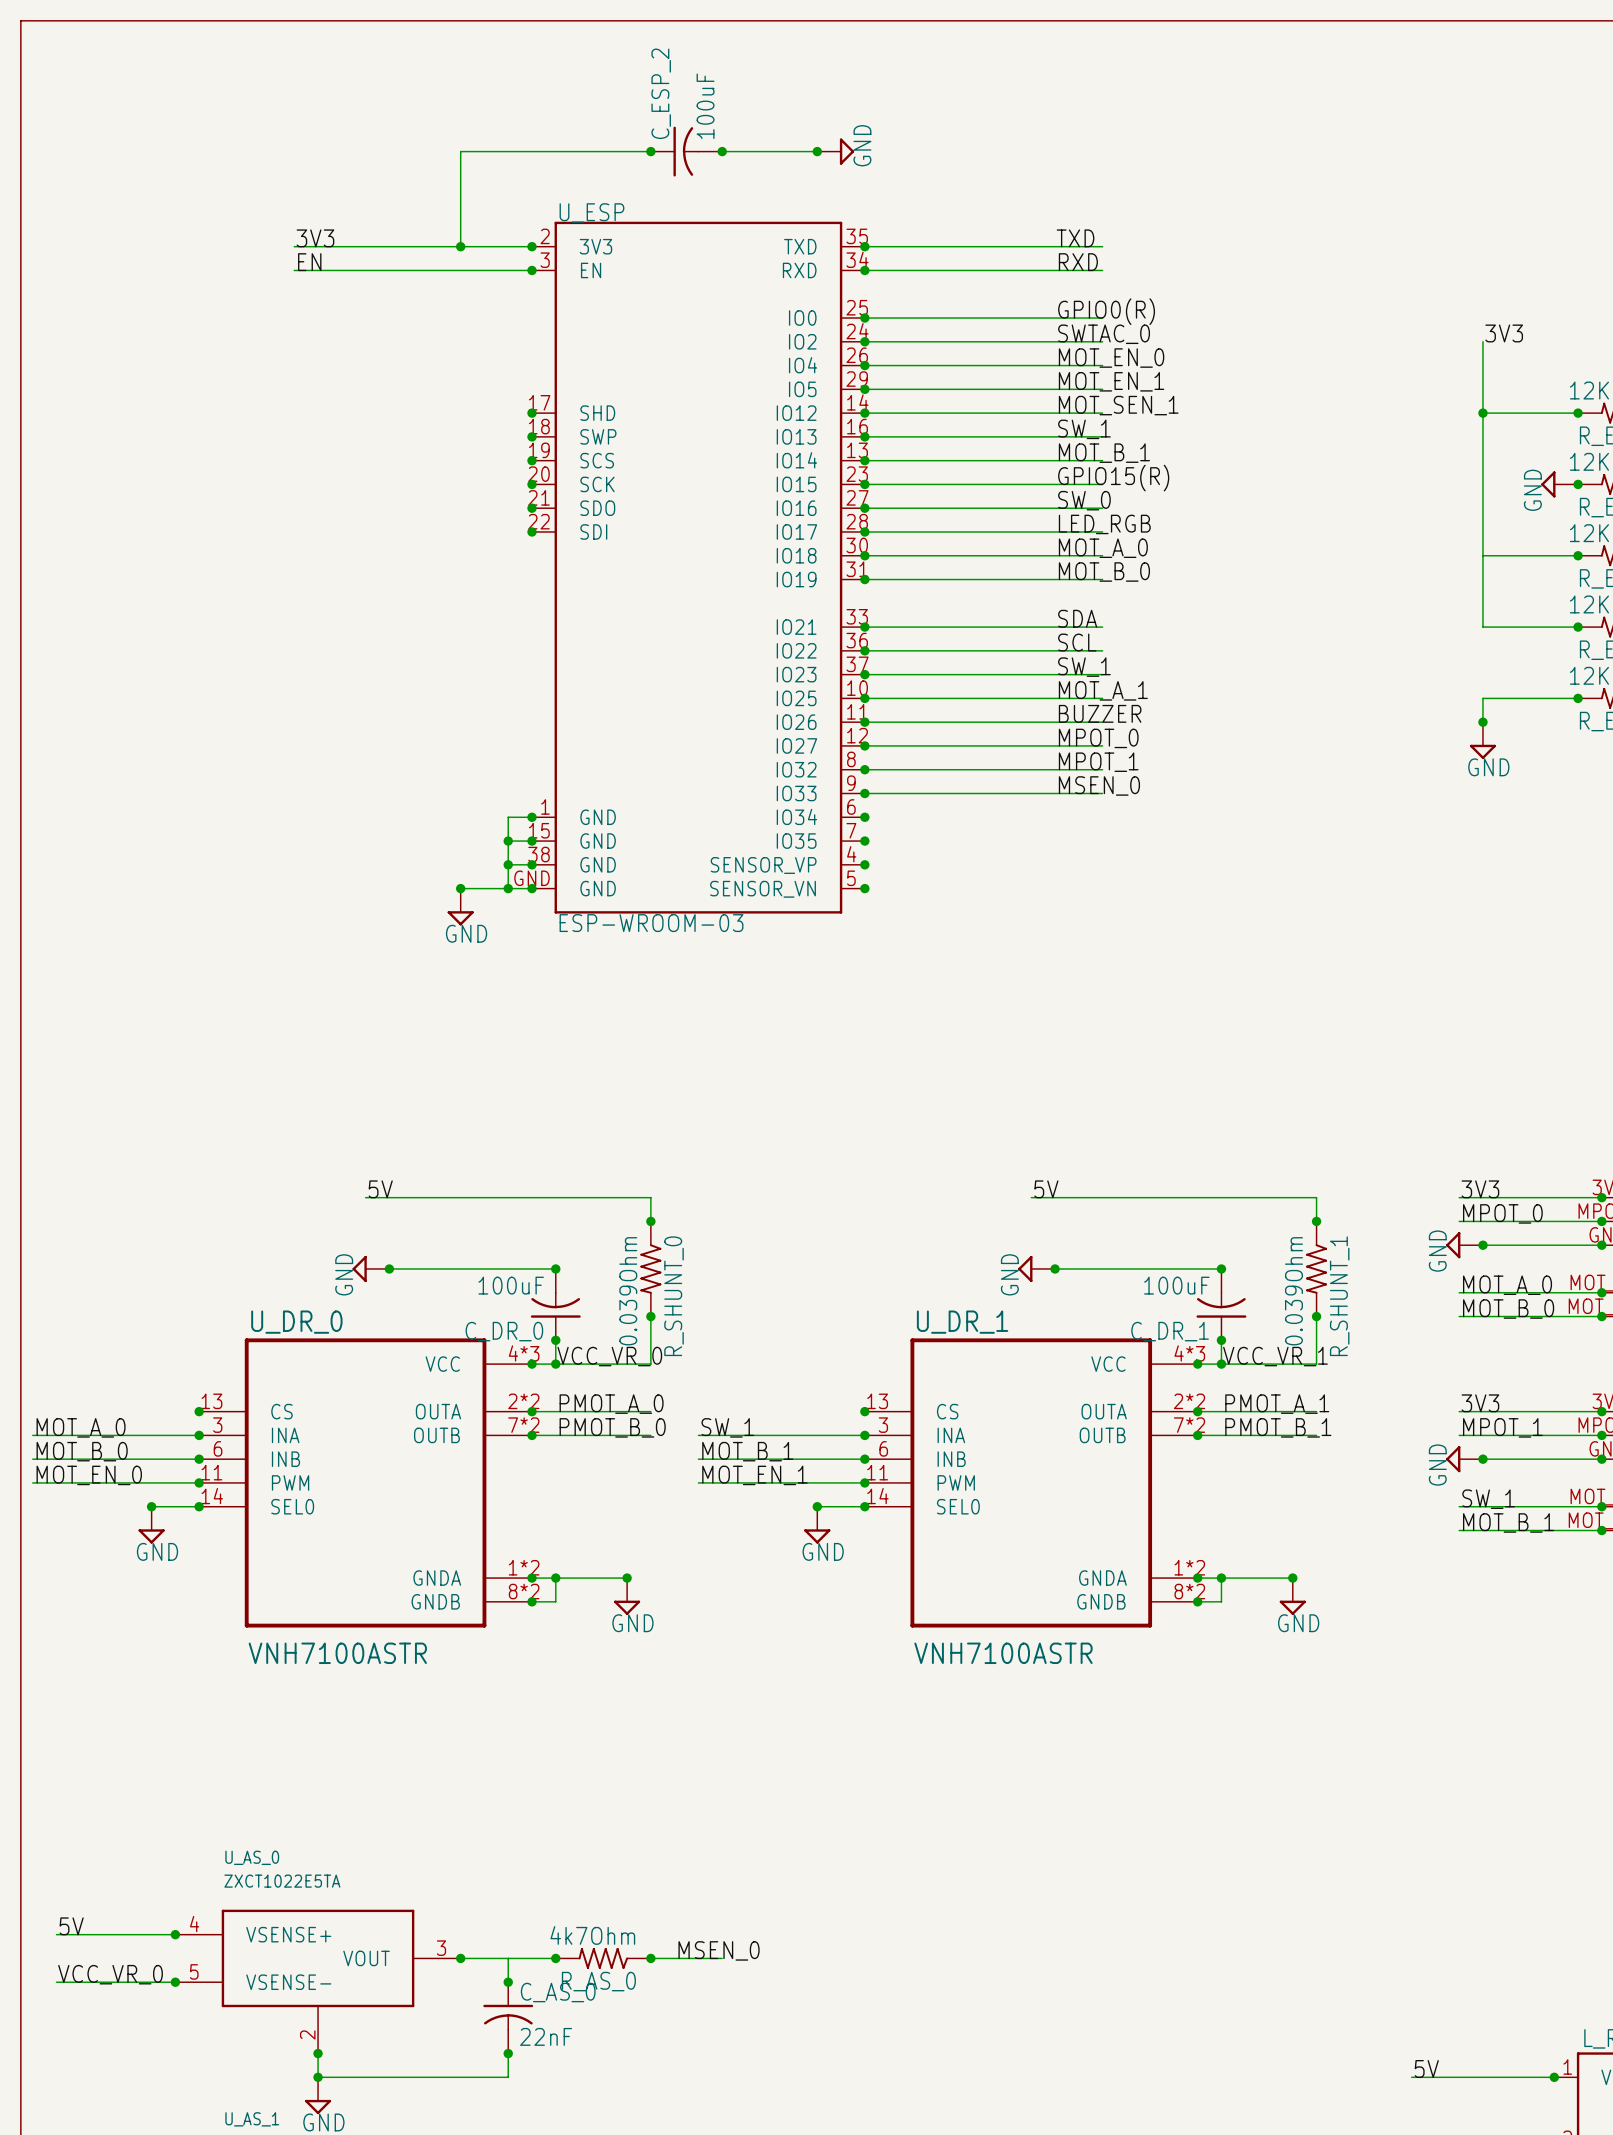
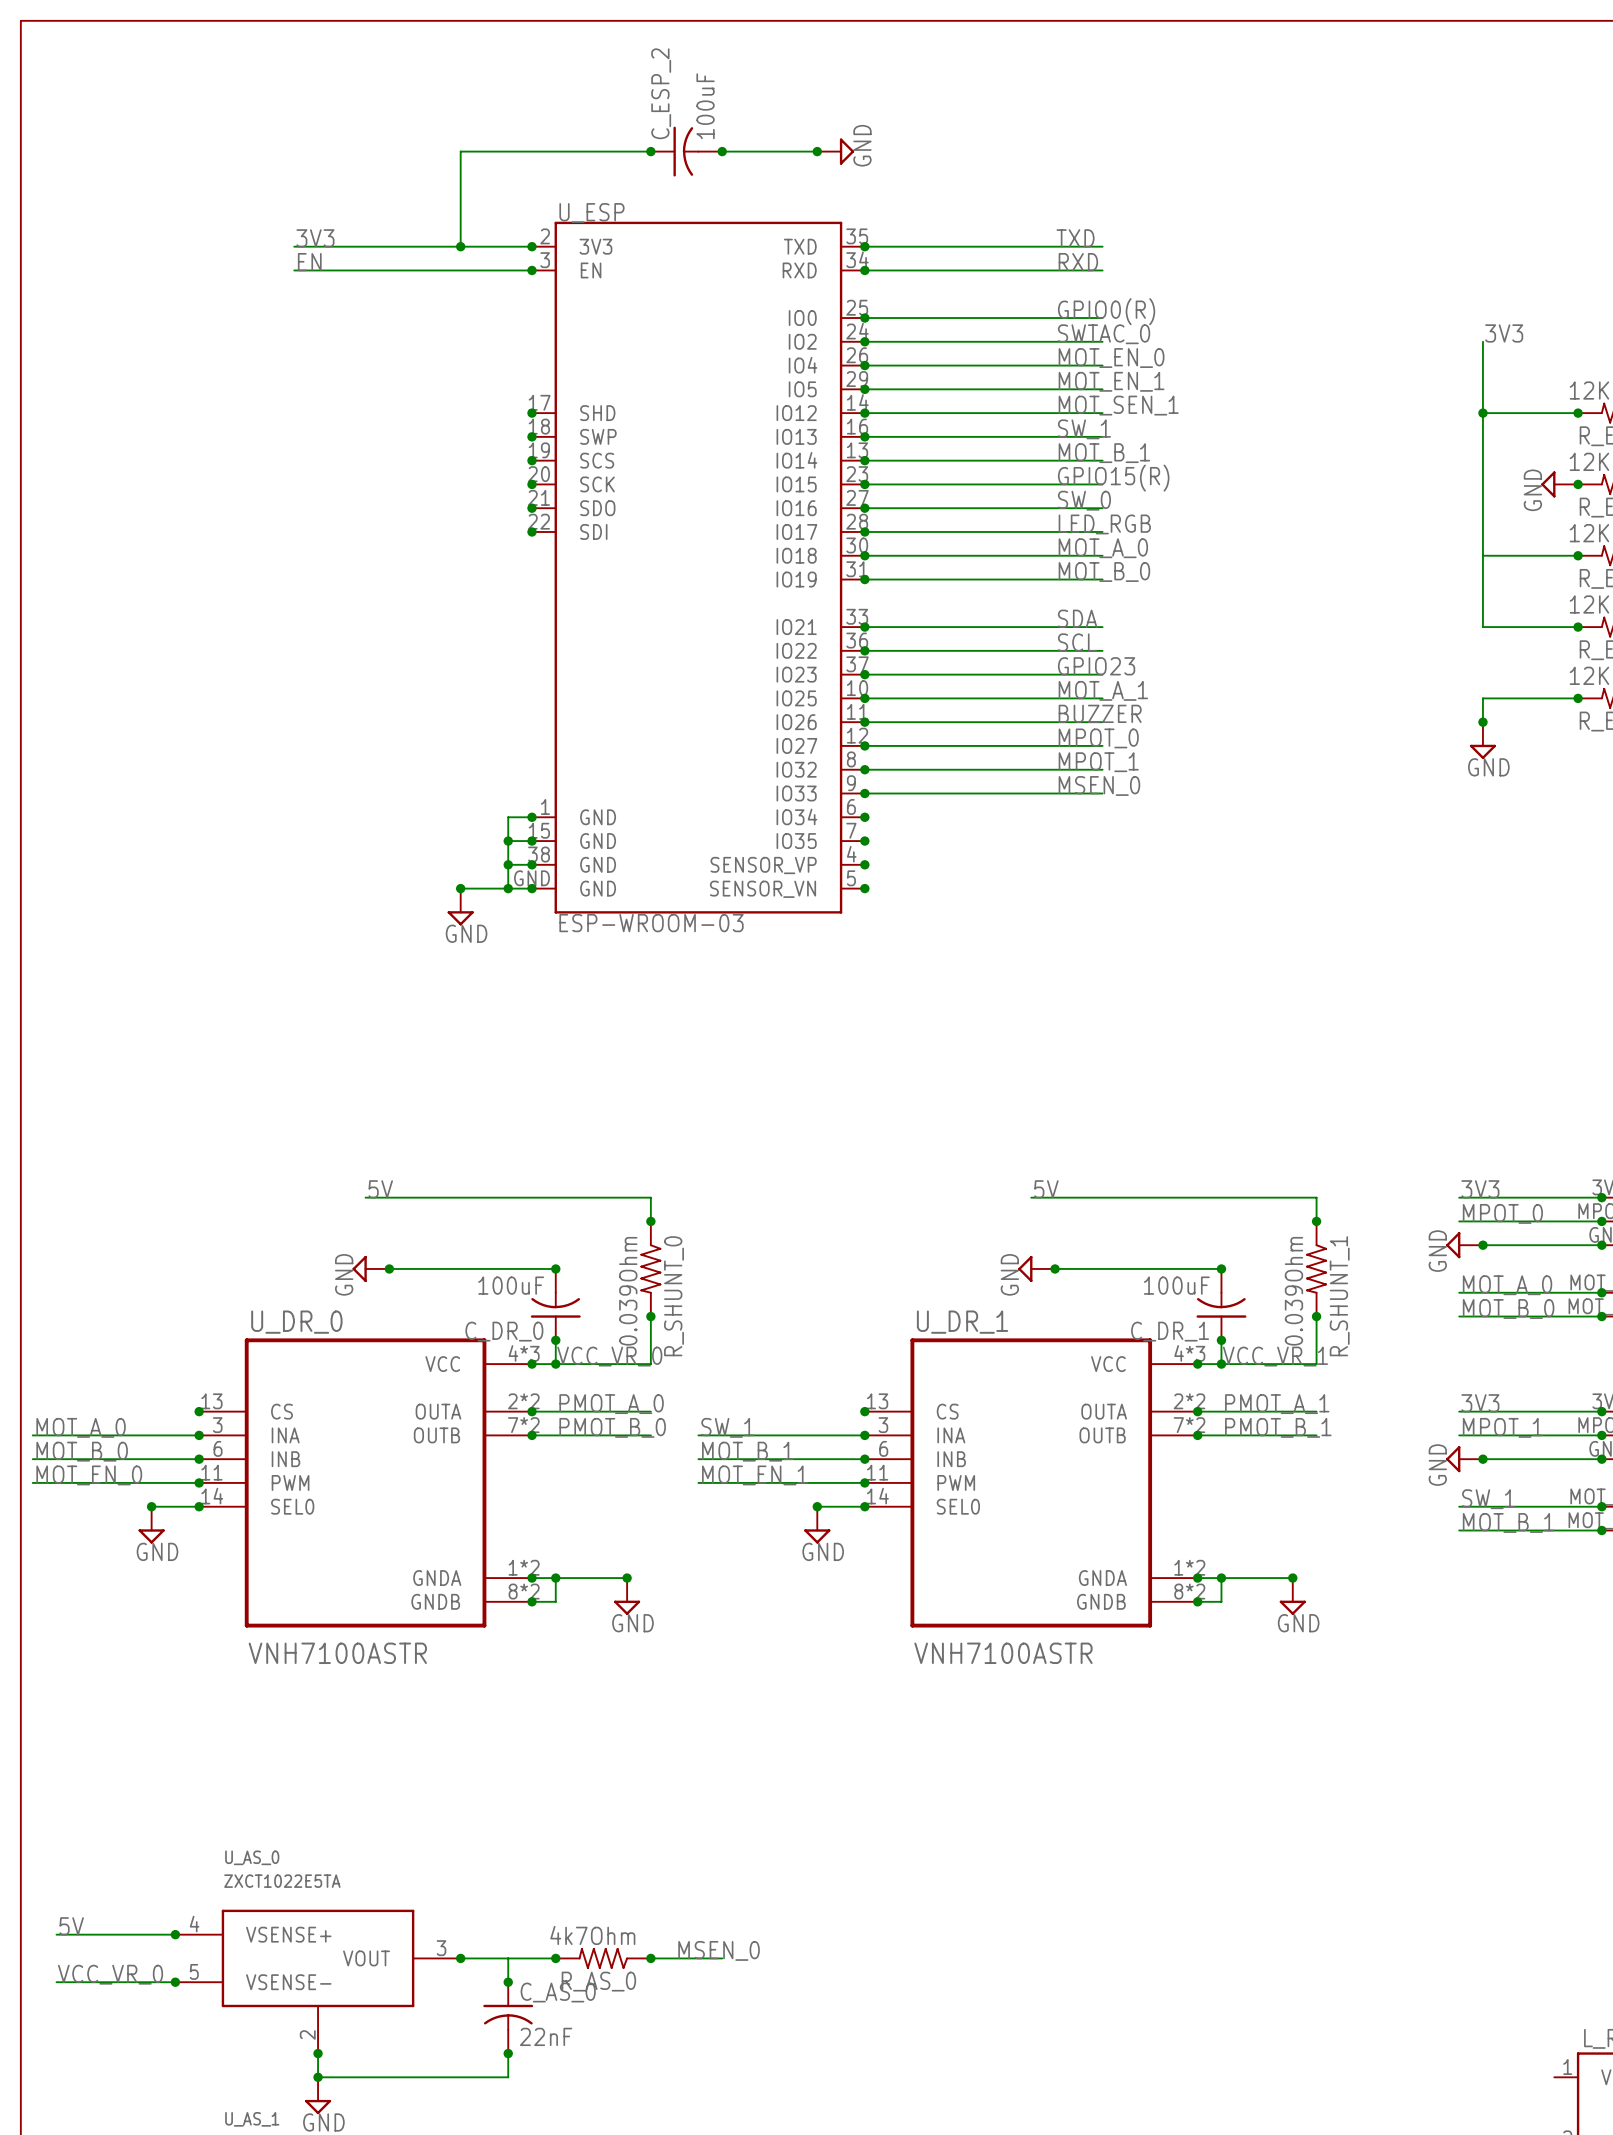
label: SW_1 (1084, 667) -> GPIO23 (1096, 666)
label: 5V (1426, 2068) -> none
wire: (1411, 2077) (1554, 2077) -> none
junction: (1554, 2077) -> none

